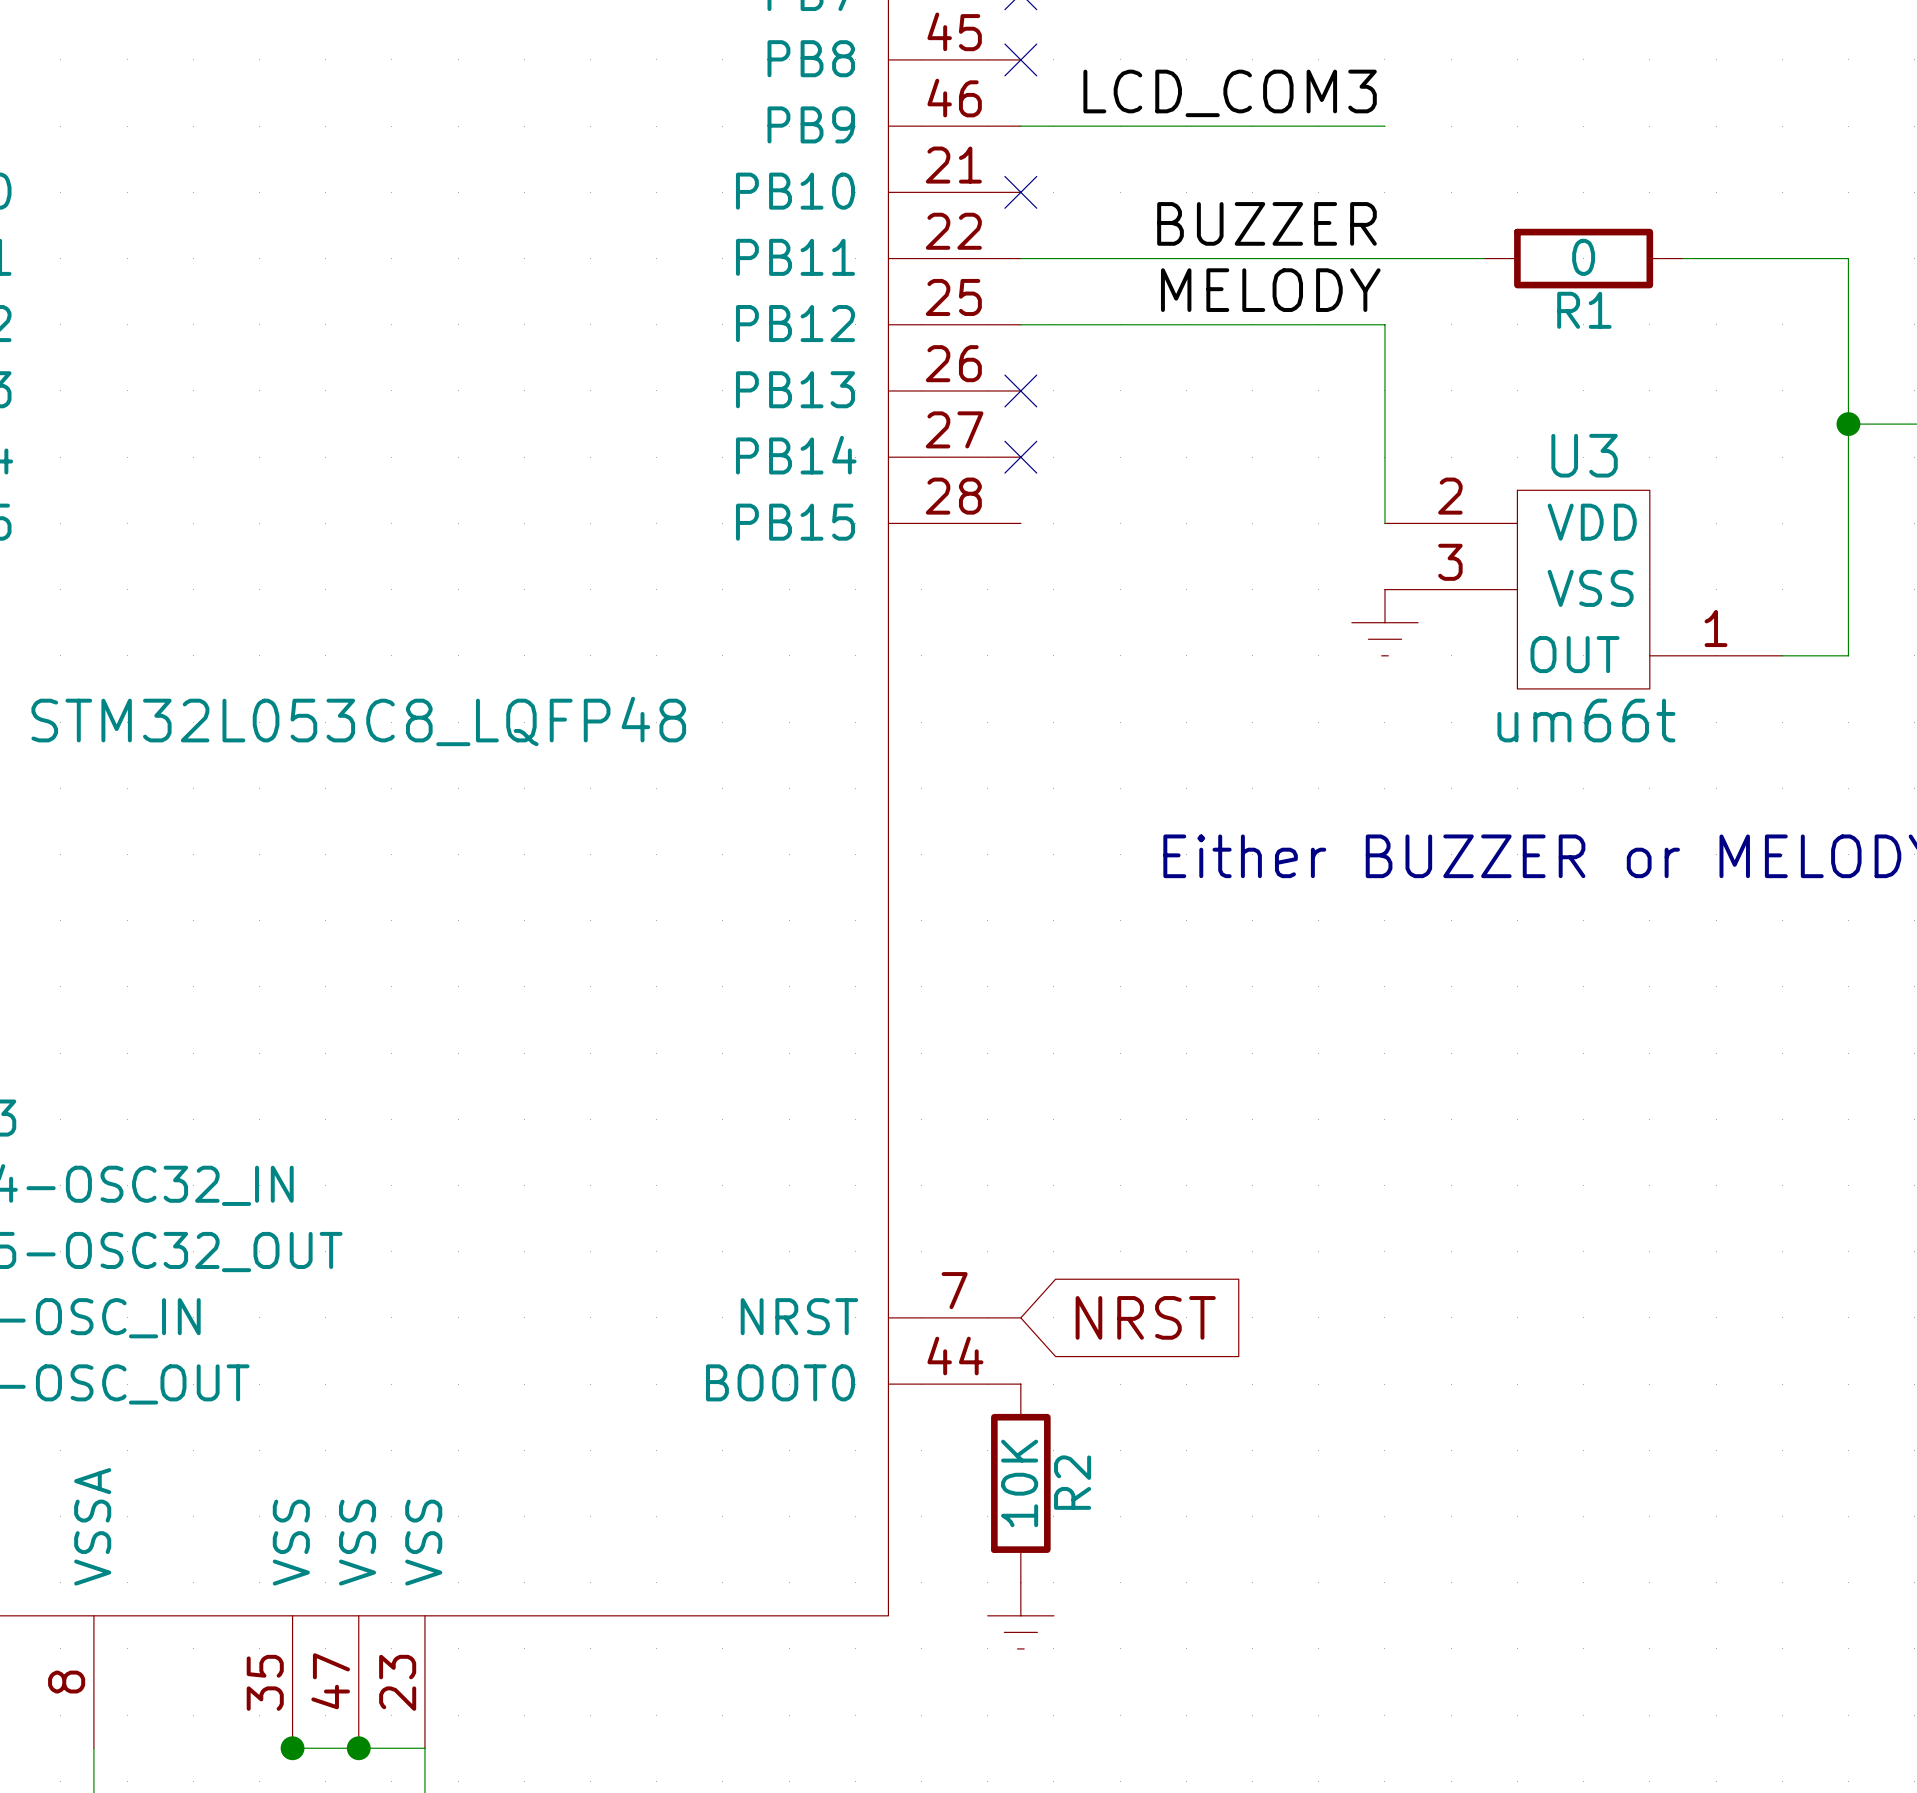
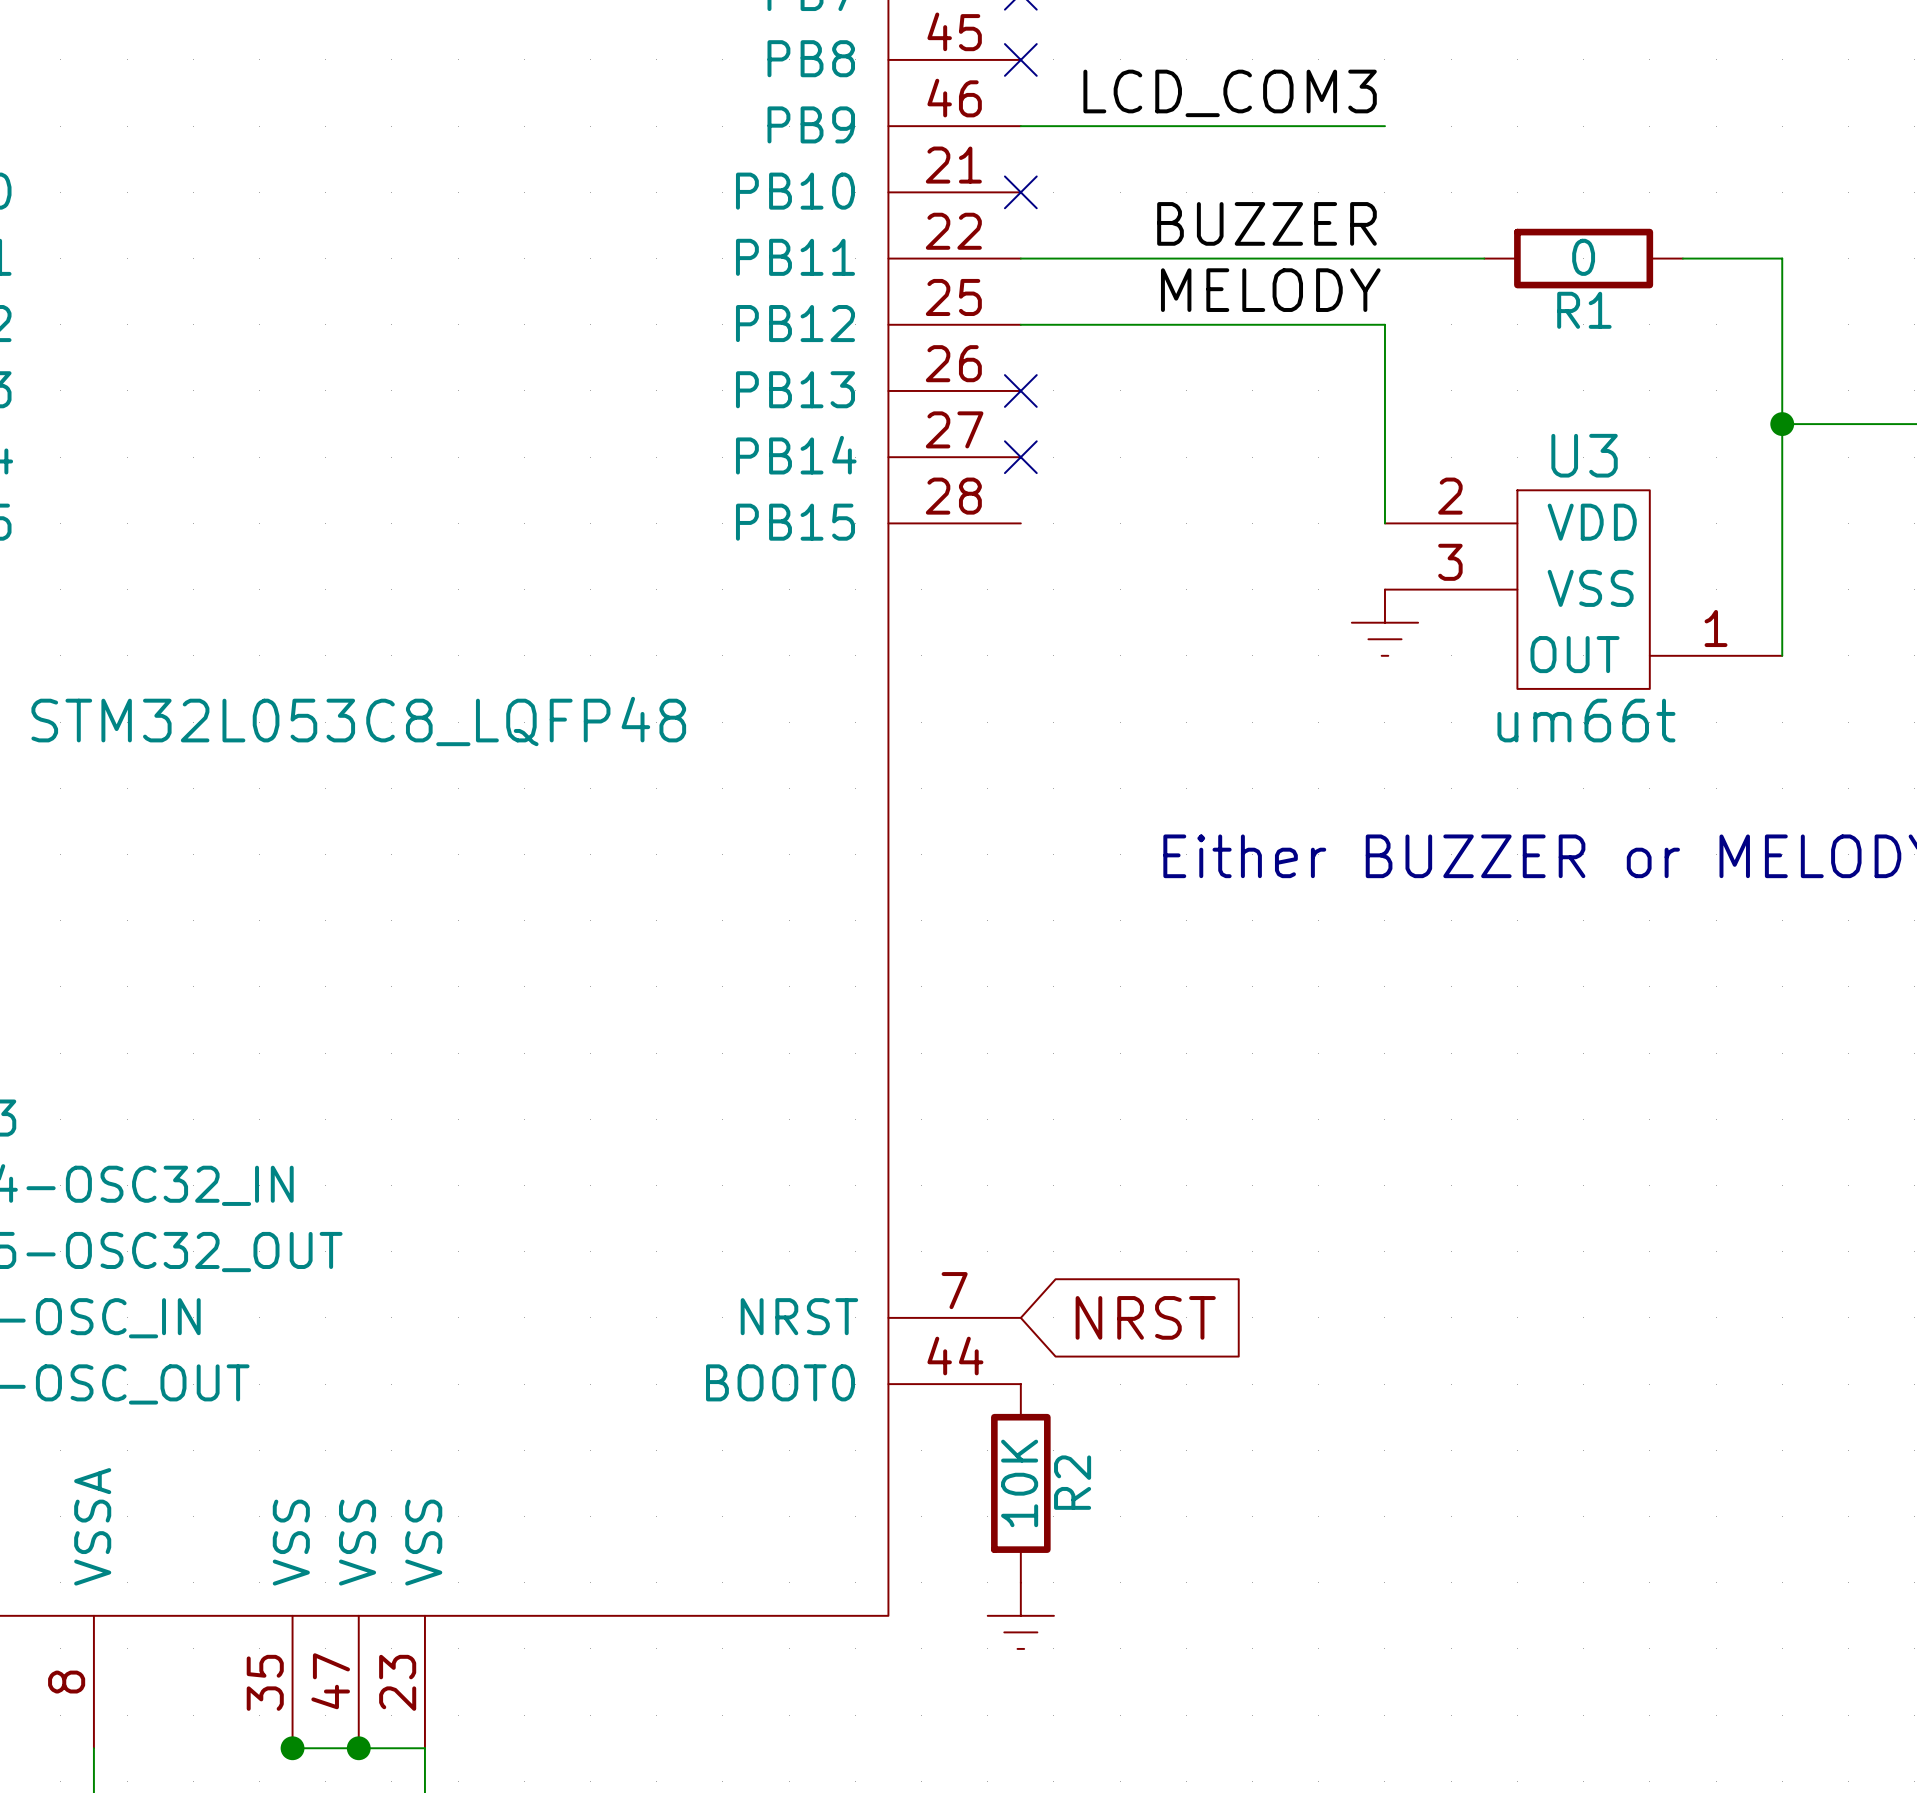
wire: (1782, 258) (1848, 258) (1848, 655) (1782, 655) -> (1782, 258) (1782, 655)
wire: none -> (1782, 424) (1848, 424)
junction position: (1848, 424) -> (1782, 424)

